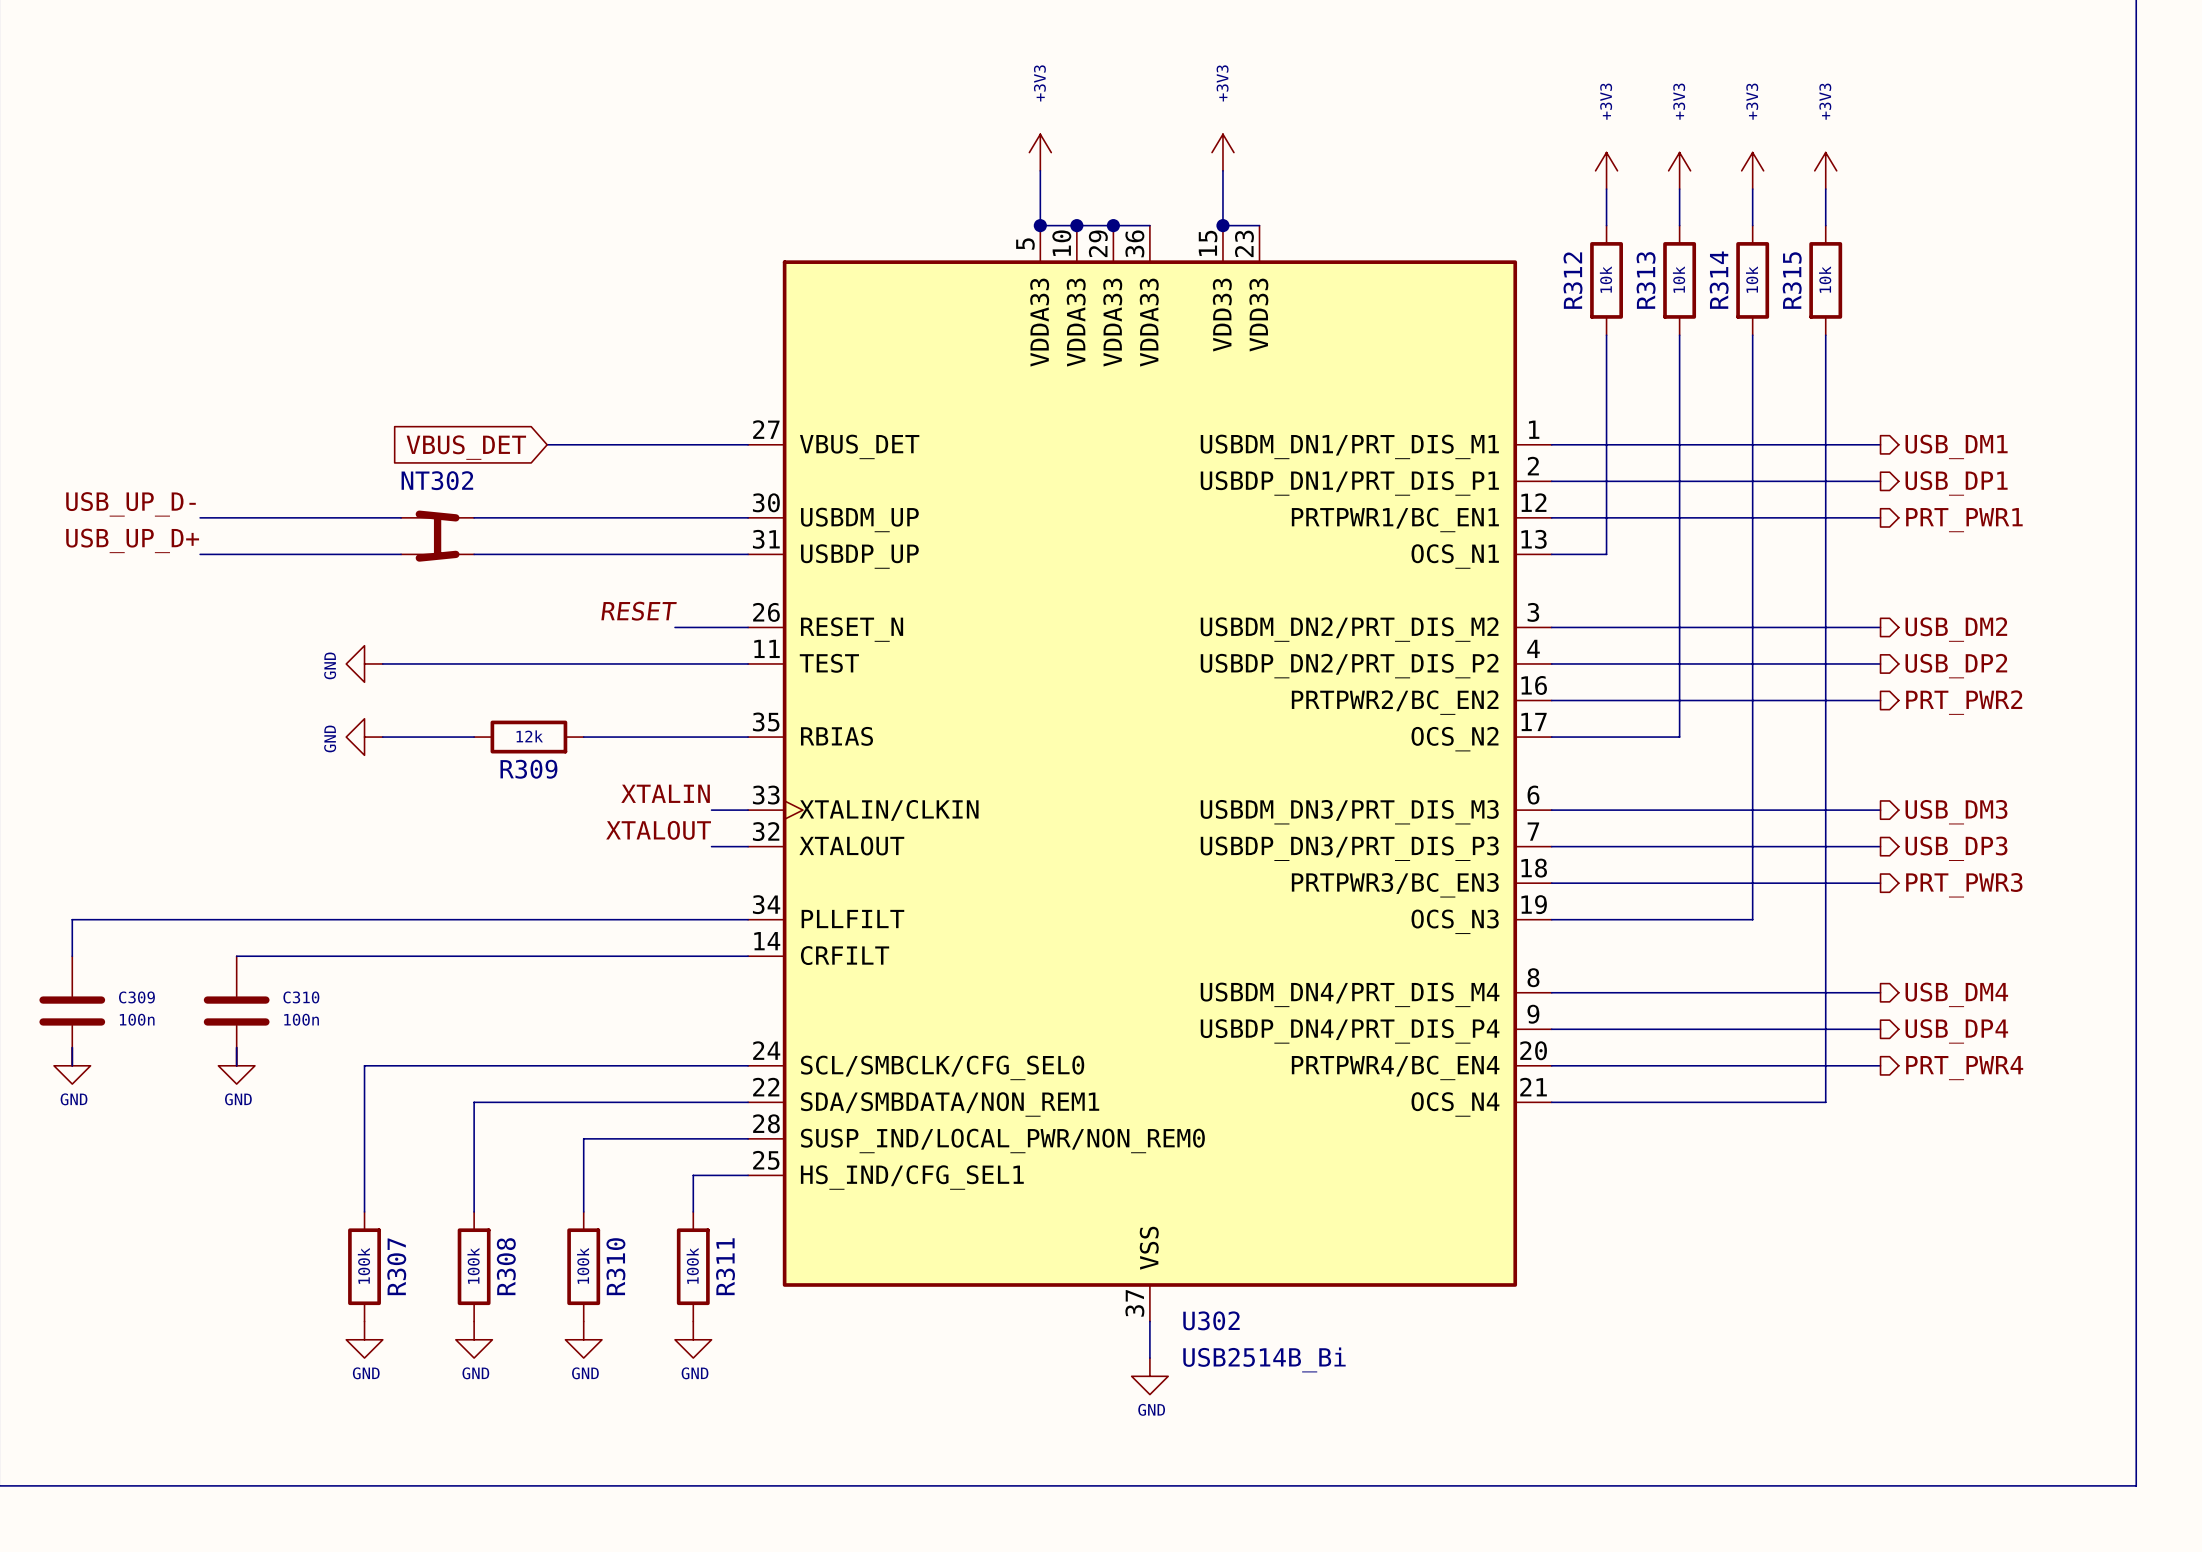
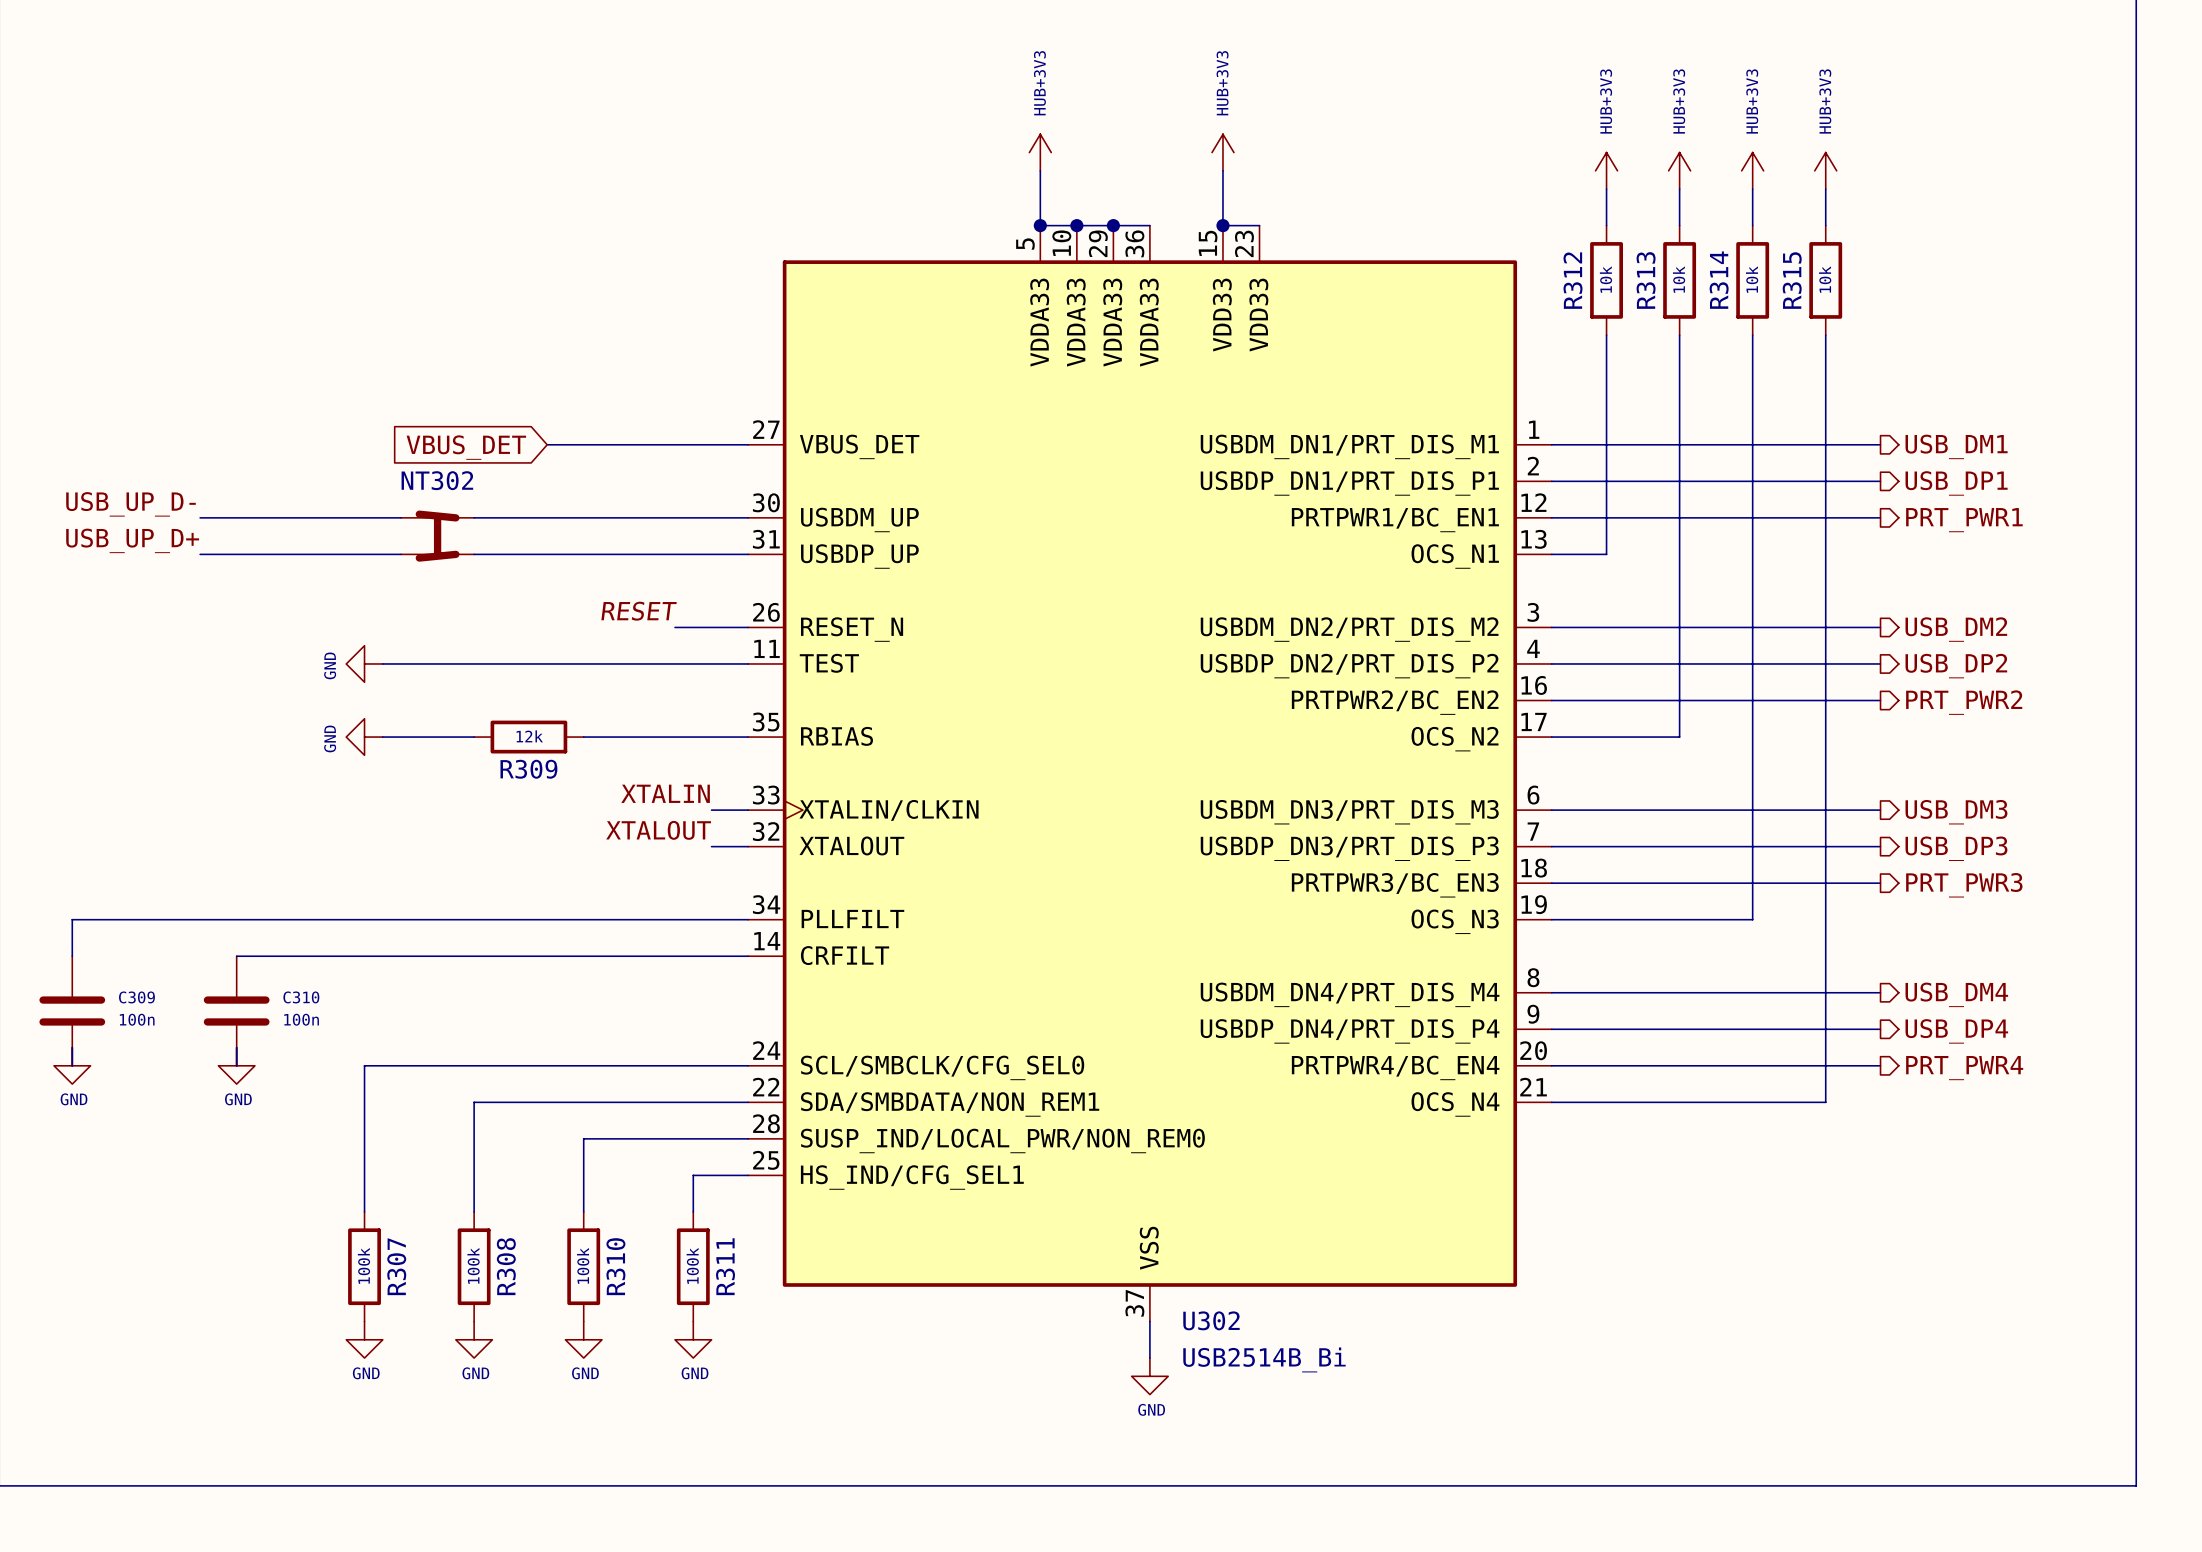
power symbol: +3V3 (1040, 152) -> HUB+3V3 (1040, 152)
power symbol: +3V3 (1222, 152) -> HUB+3V3 (1222, 152)
power symbol: +3V3 (1606, 170) -> HUB+3V3 (1606, 170)
power symbol: +3V3 (1679, 170) -> HUB+3V3 (1679, 170)
power symbol: +3V3 (1752, 170) -> HUB+3V3 (1752, 170)
power symbol: +3V3 (1825, 170) -> HUB+3V3 (1825, 170)

